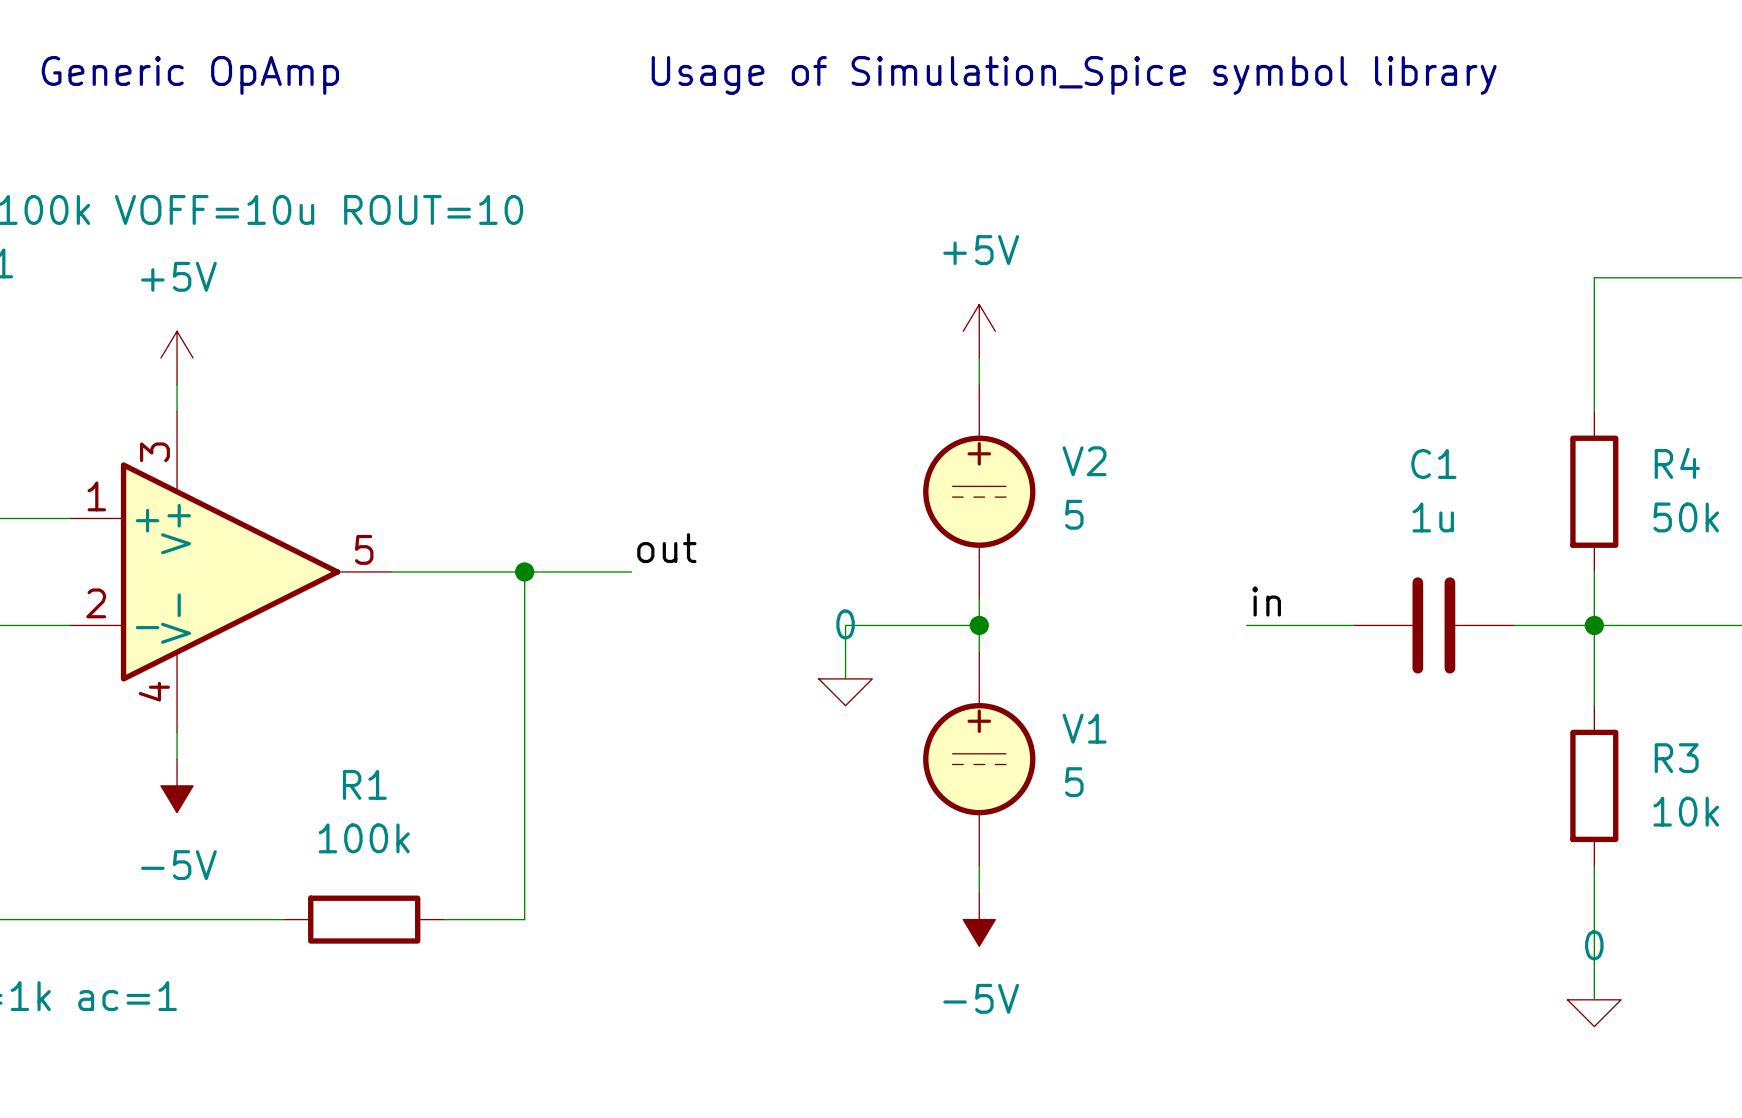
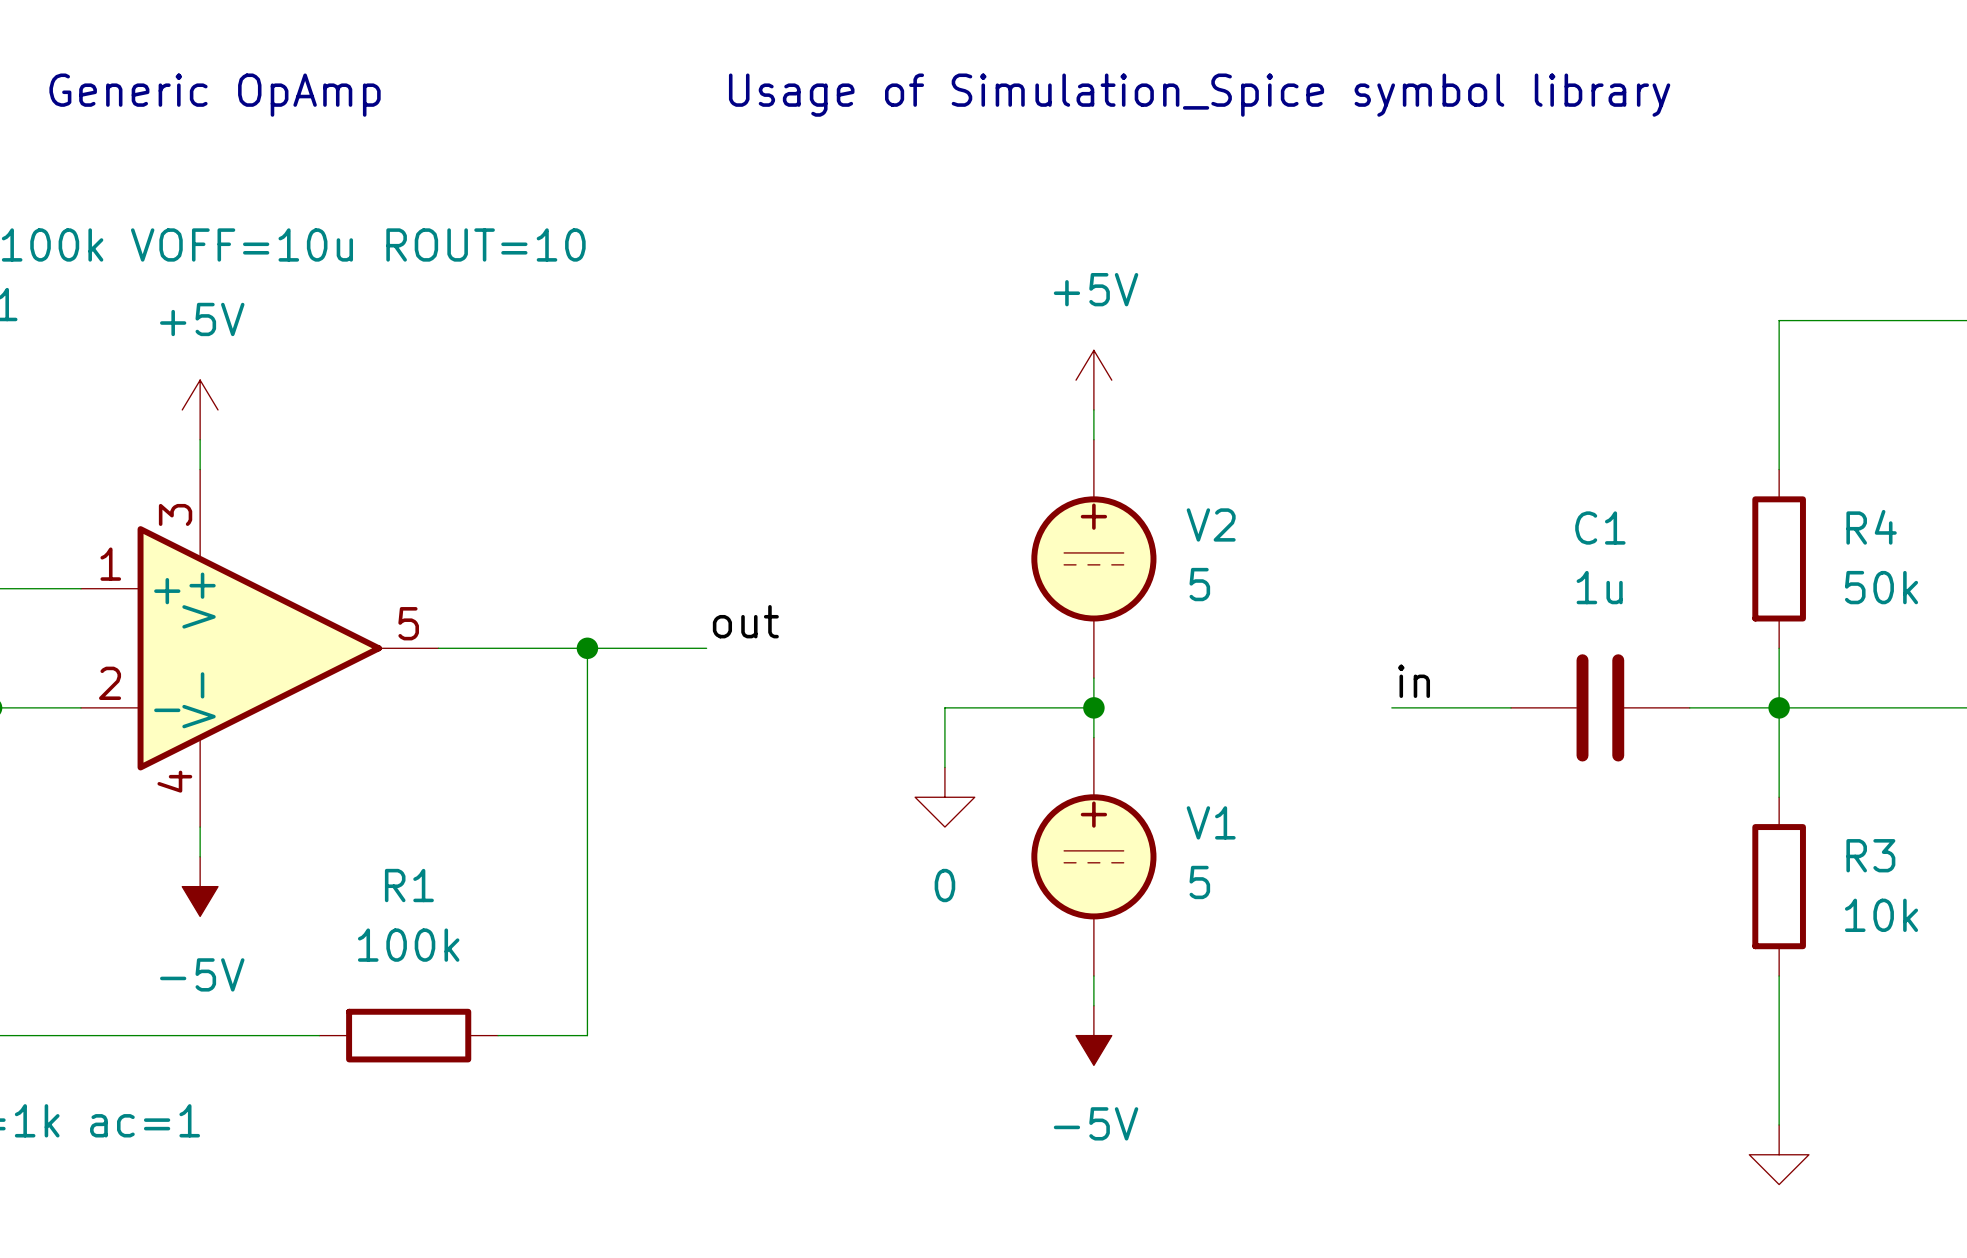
power symbol text position: 0 (845, 624) -> 0 (944, 885)
power symbol shape: [818, 678, 873, 706] -> [915, 767, 975, 828]
power symbol text: 0 (1594, 945) -> none
power symbol shape: [1567, 999, 1622, 1027] -> [1749, 1124, 1809, 1185]

